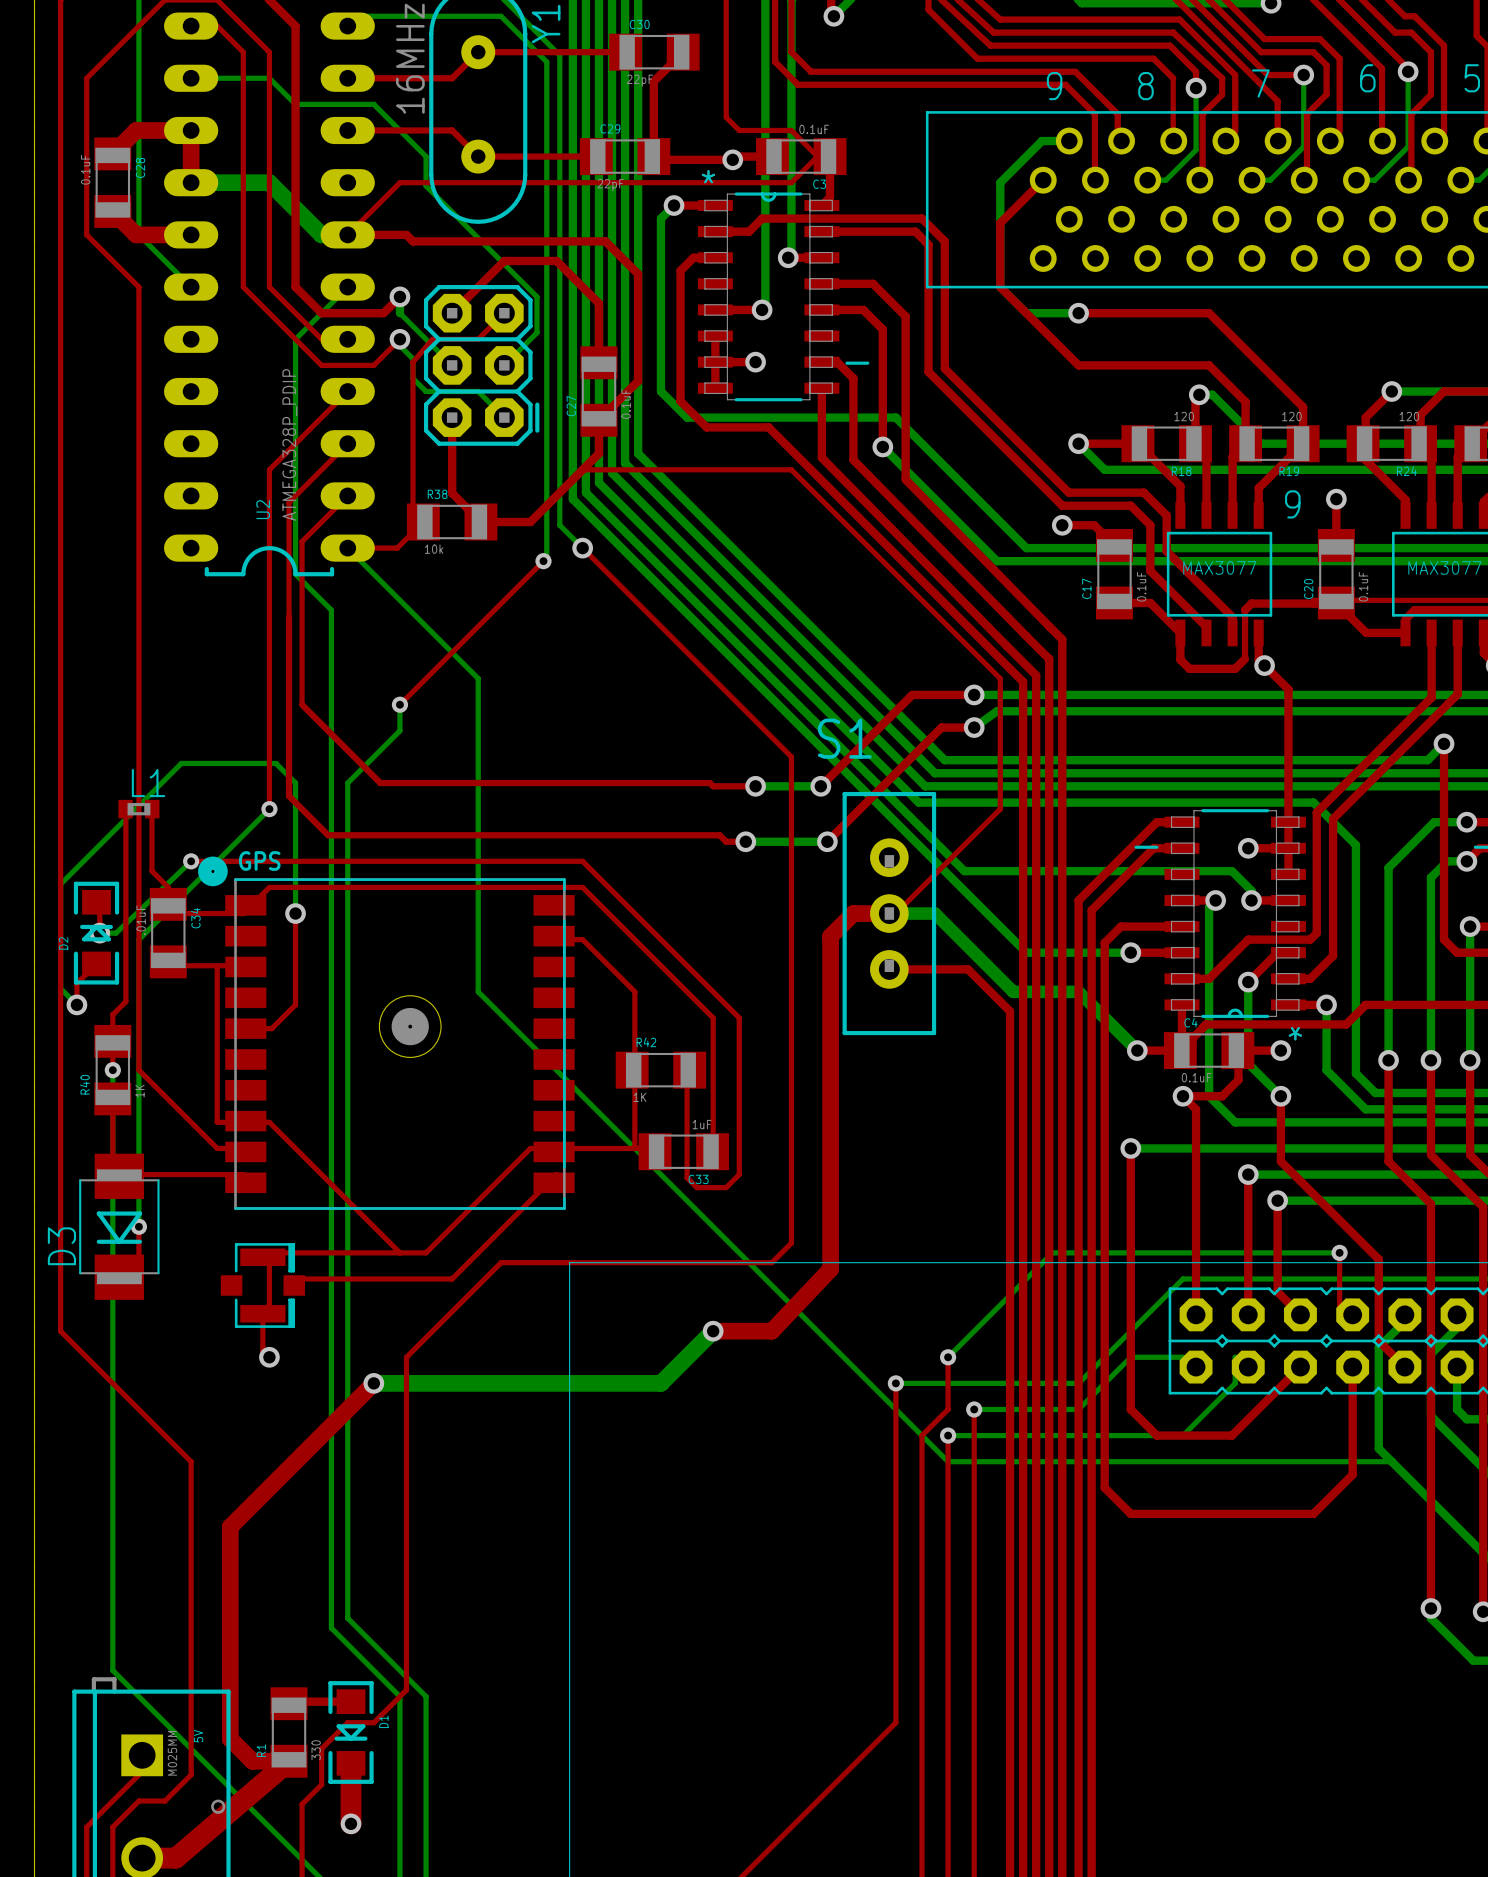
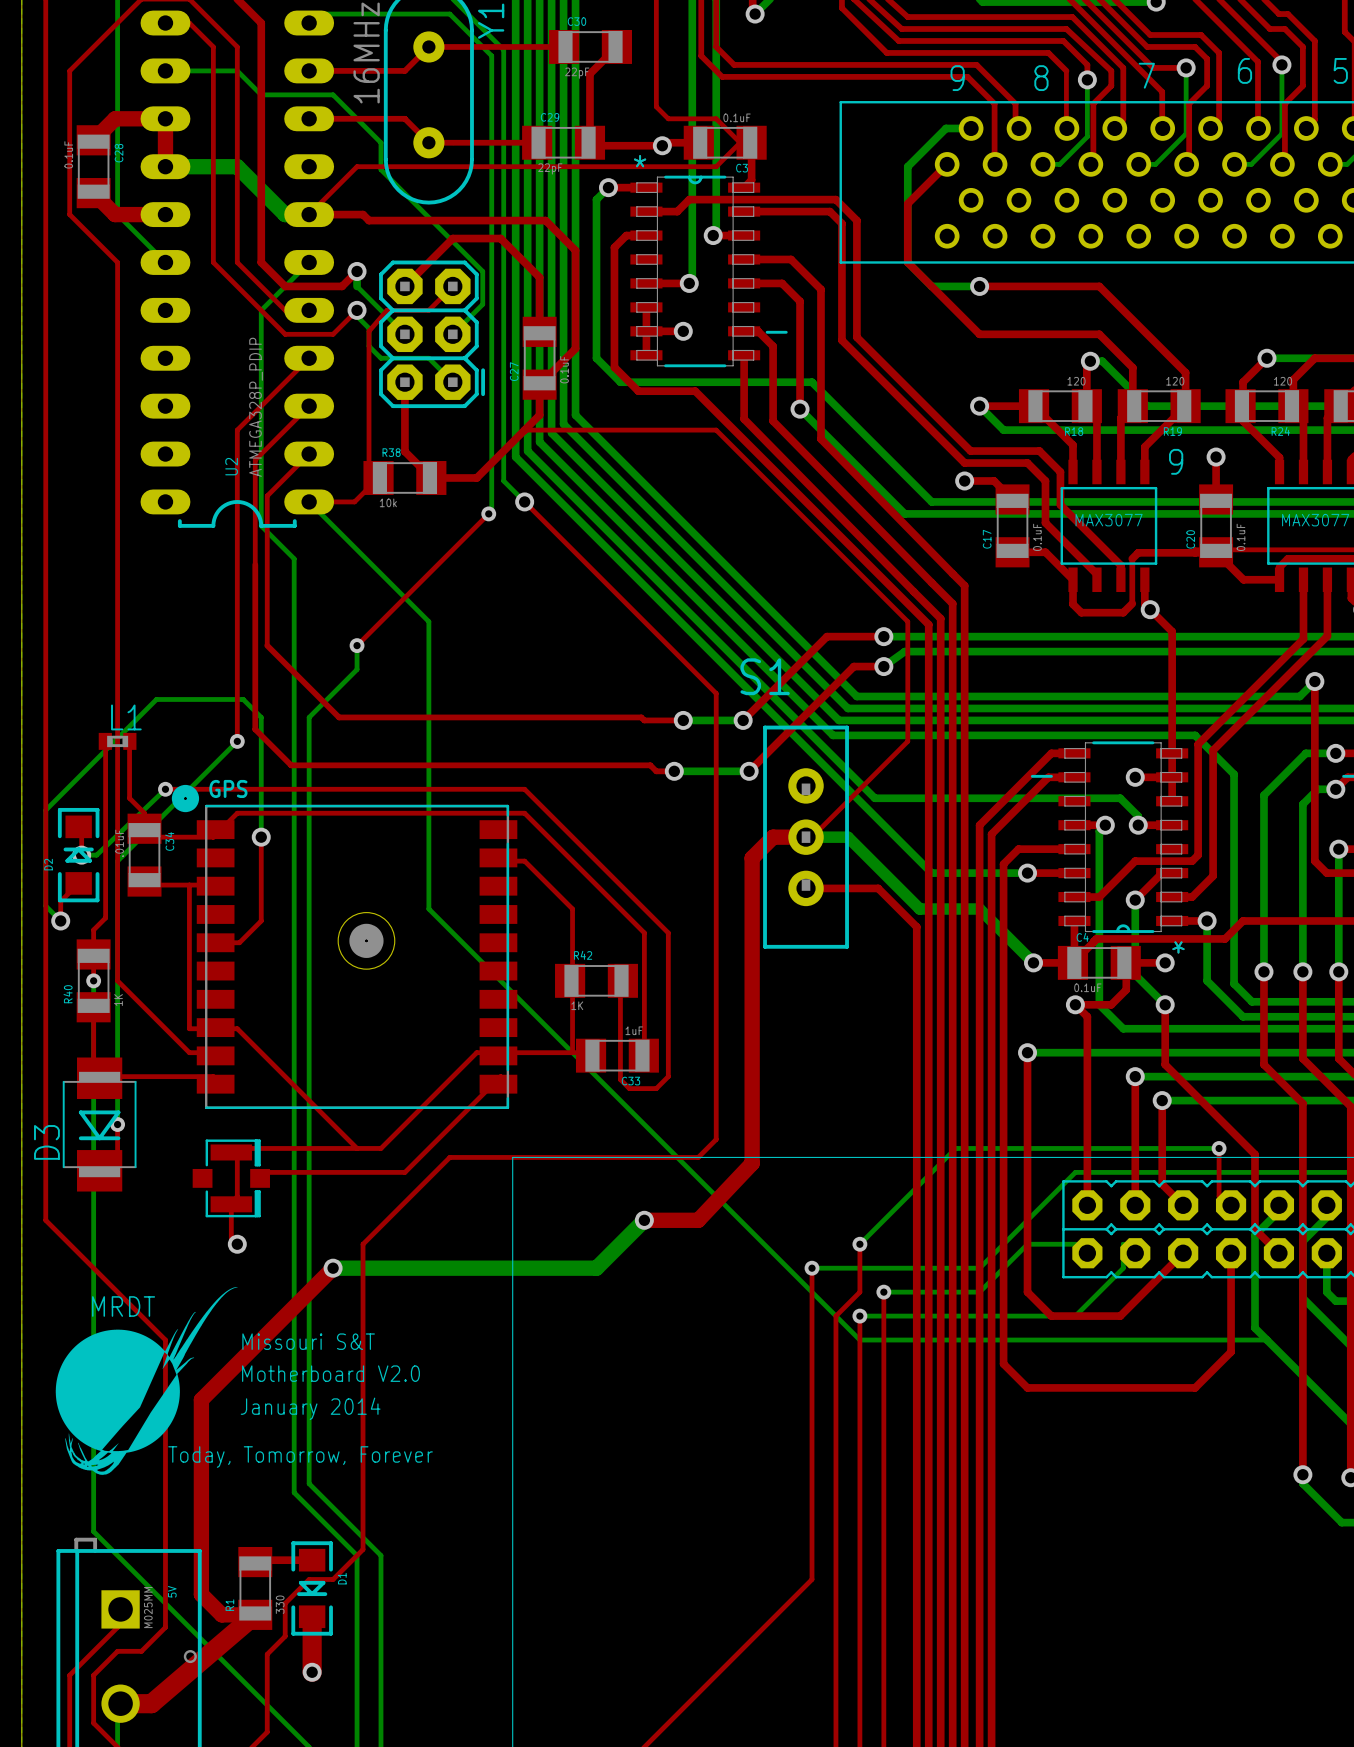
drawing: none -> [55, 1287, 238, 1476]
text: none -> MRDT (123, 1306)
text: none -> Missouri S&T (308, 1341)
text: none -> Motherboard V2.0 (330, 1373)
text: none -> January 2014 (310, 1408)
text: none -> Today, Tomorrow, Forever (300, 1457)

